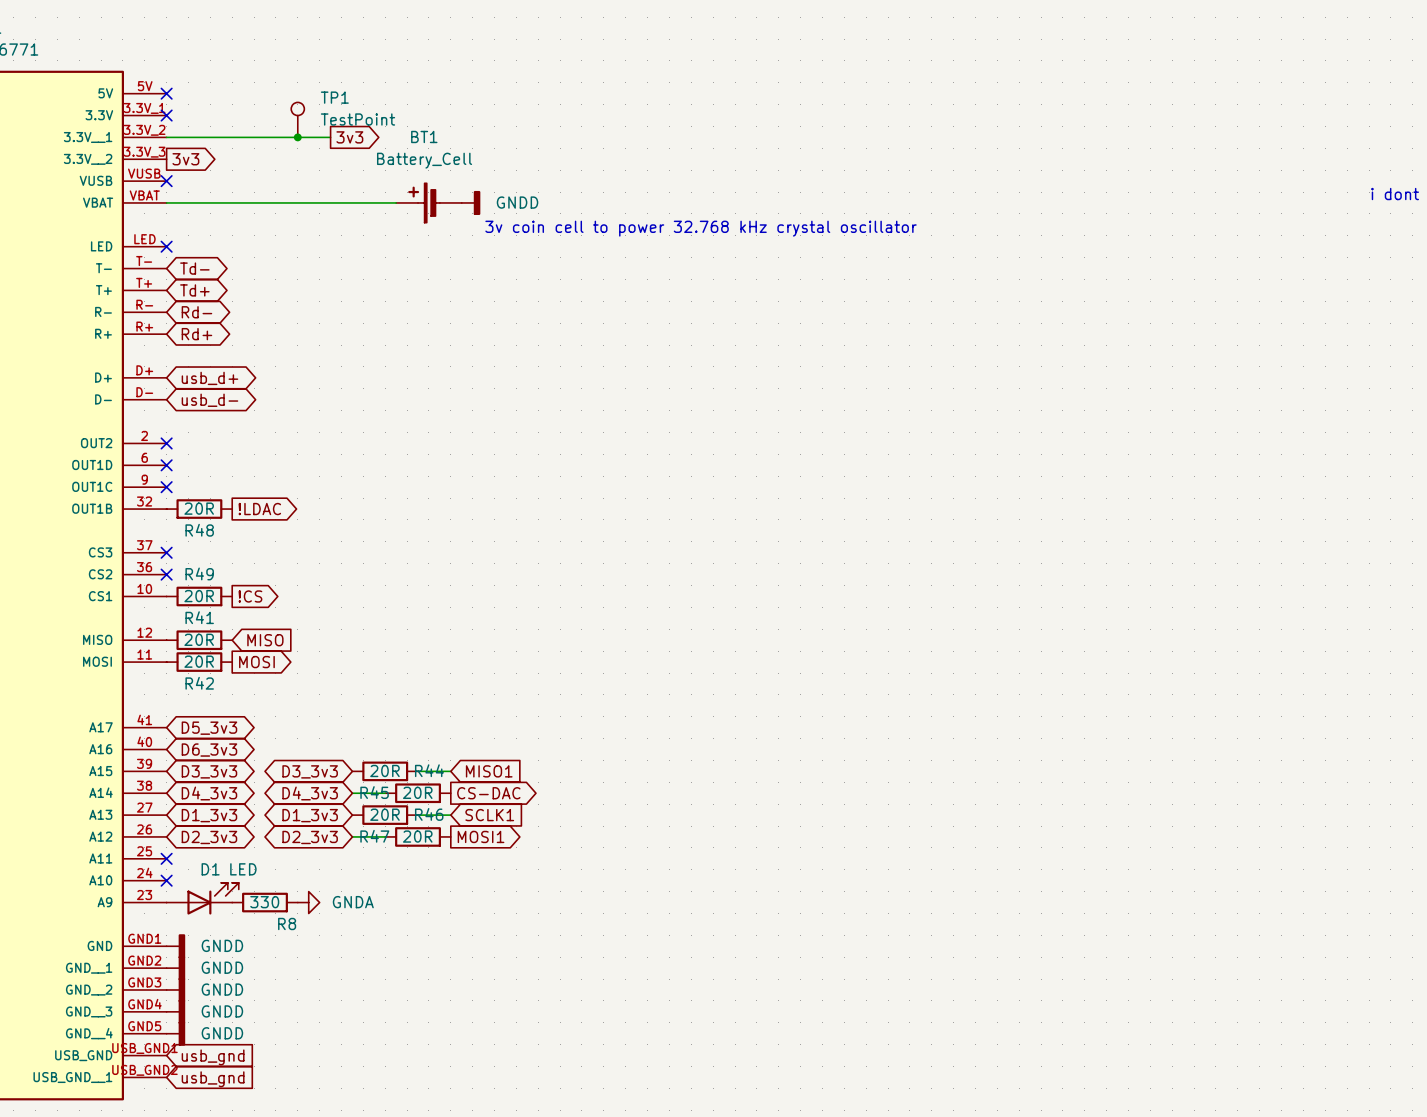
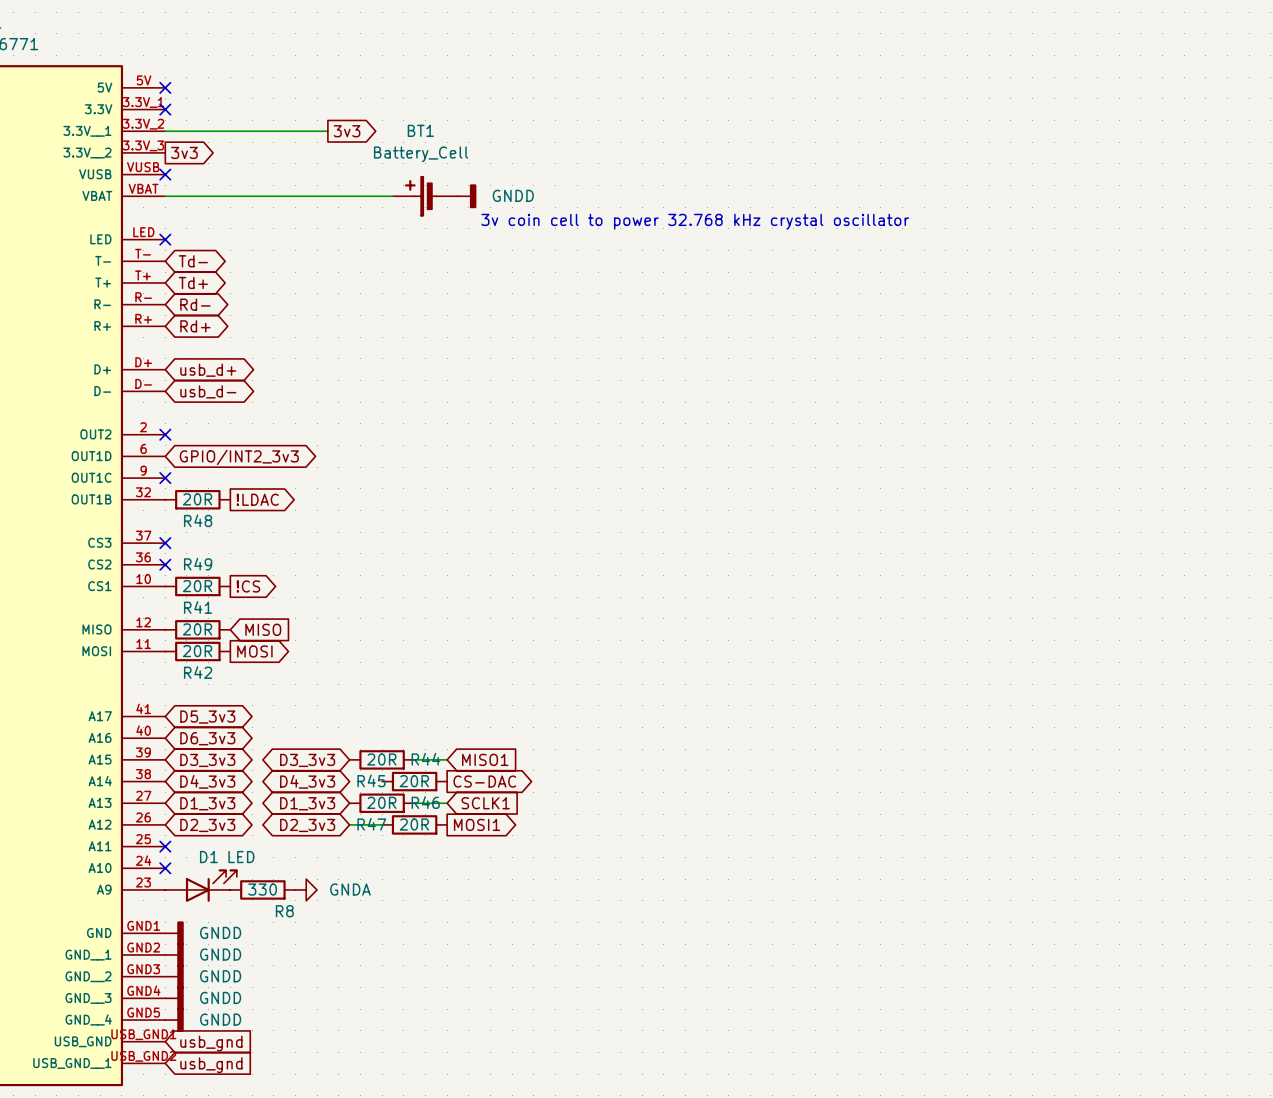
TP1: TestPoint (297, 119) -> none
junction: (297, 137) -> none
no-connect mark: (166, 465) -> none
global label: none -> GPIO/INT2_3v3 (239, 457)
wire: (352, 793) (385, 793) -> none

